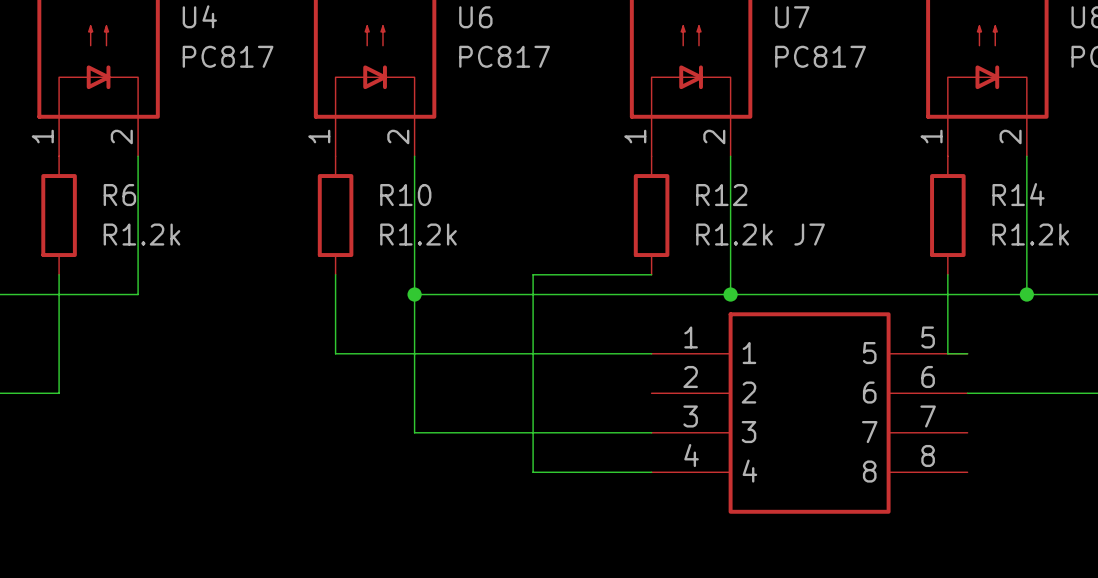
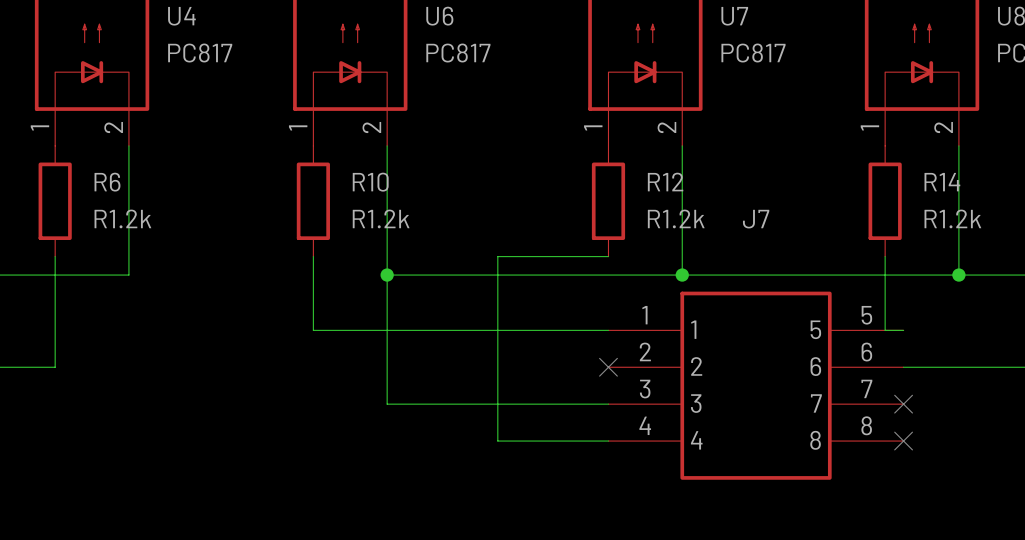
no-connect mark: none -> (608, 367)
no-connect mark: none -> (903, 404)
no-connect mark: none -> (903, 441)

